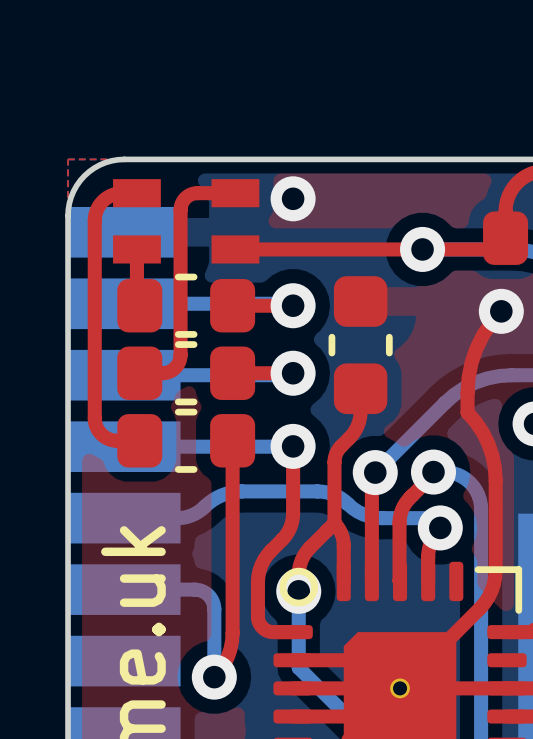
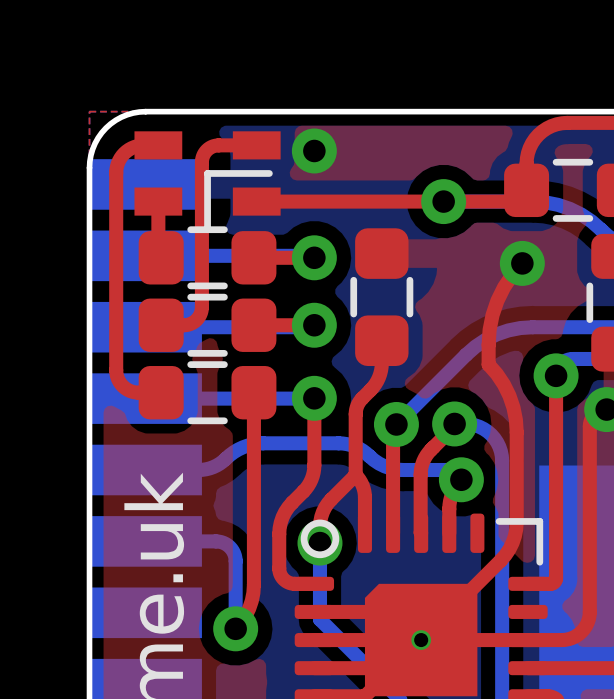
part footprint: [113, 179, 260, 264] -> [134, 131, 281, 234]
part footprint: [117, 273, 256, 338] -> [138, 226, 277, 290]
part footprint: [328, 276, 393, 415] -> [350, 228, 414, 367]
part footprint: [117, 341, 256, 406] -> [138, 293, 277, 357]
part footprint: [117, 408, 256, 473] -> [138, 361, 277, 425]

